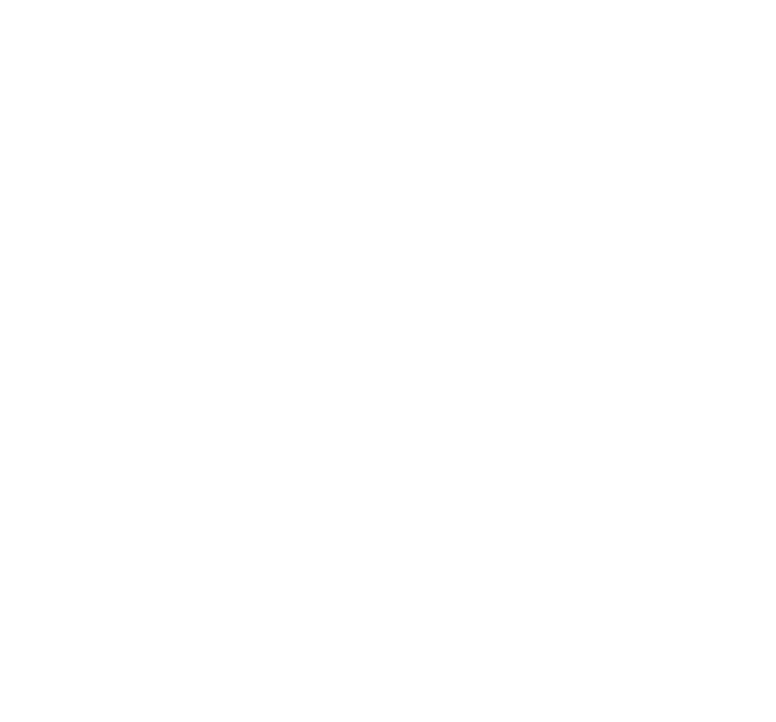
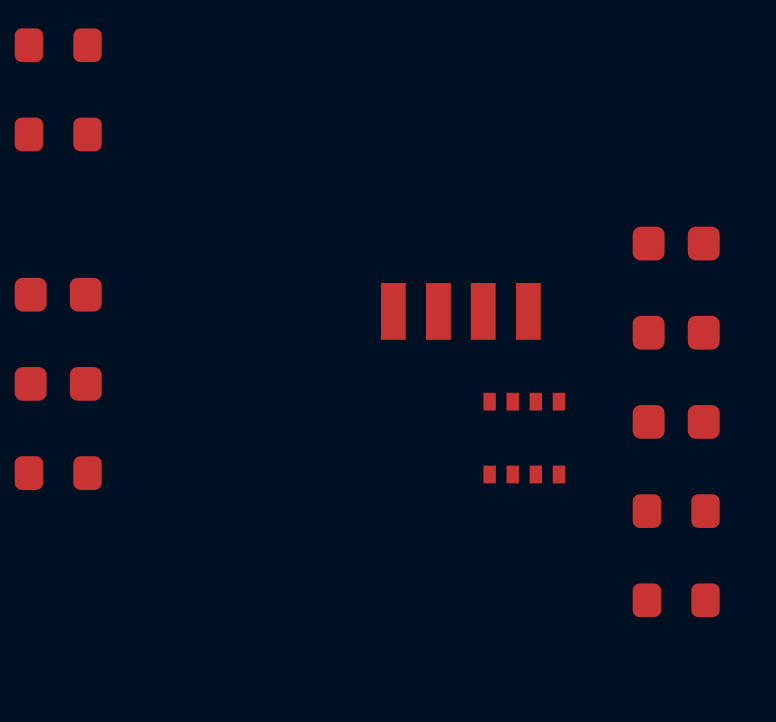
part: none -> (58, 45)
part: none -> (58, 134)
part: none -> (676, 243)
part: none -> (58, 294)
part: none -> (460, 311)
part: none -> (676, 332)
part: none -> (58, 383)
part: none -> (676, 421)
part: none -> (524, 438)
part: none -> (58, 473)
part: none -> (676, 511)
part: none -> (676, 600)

